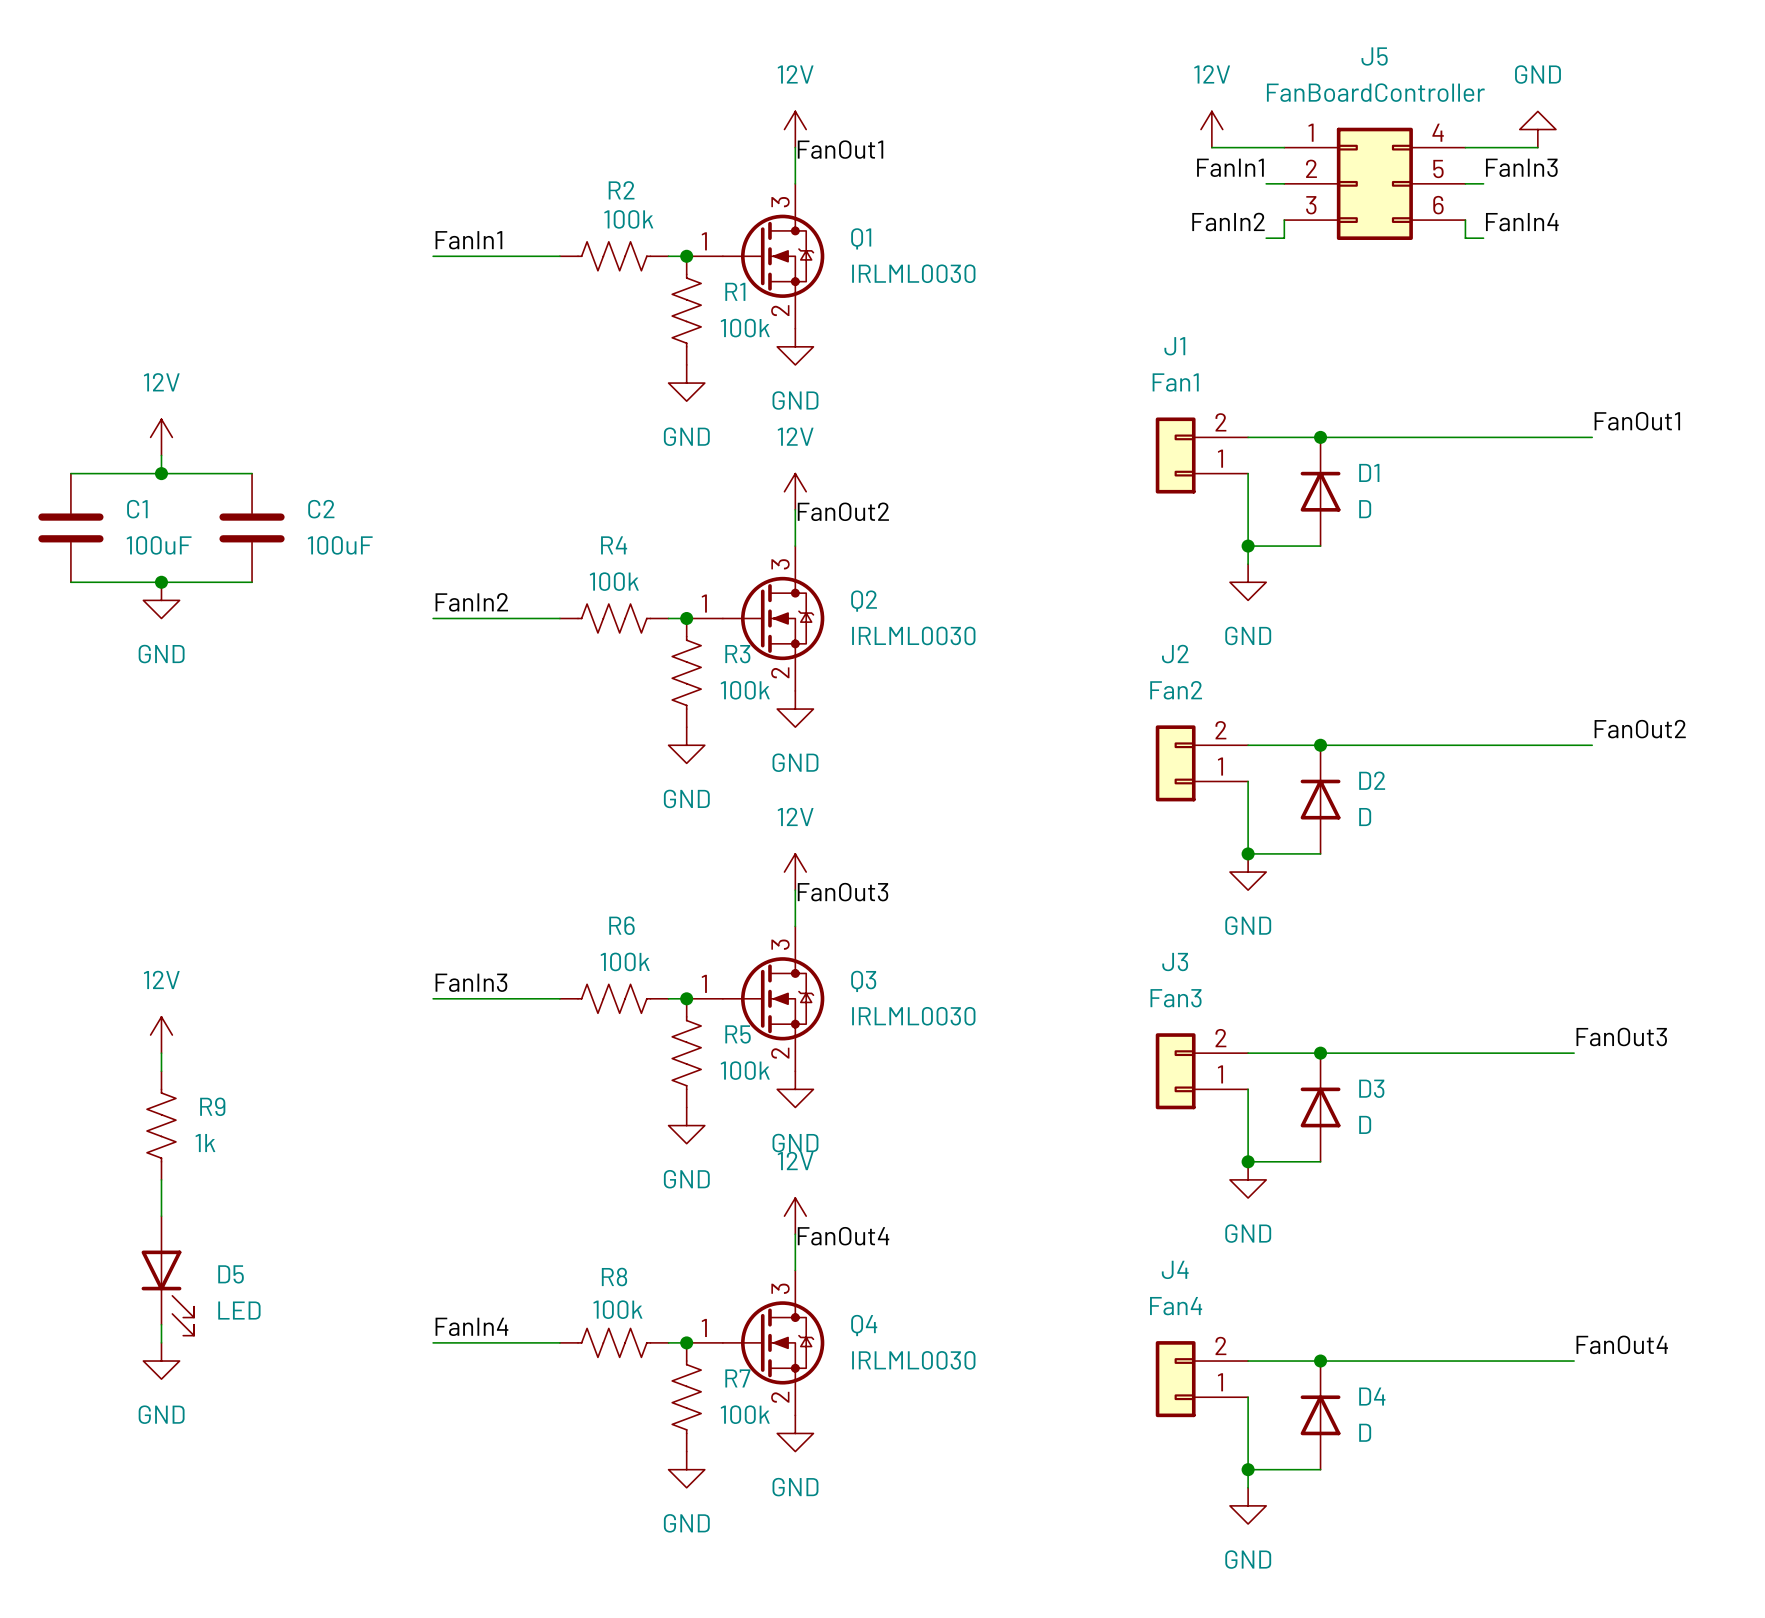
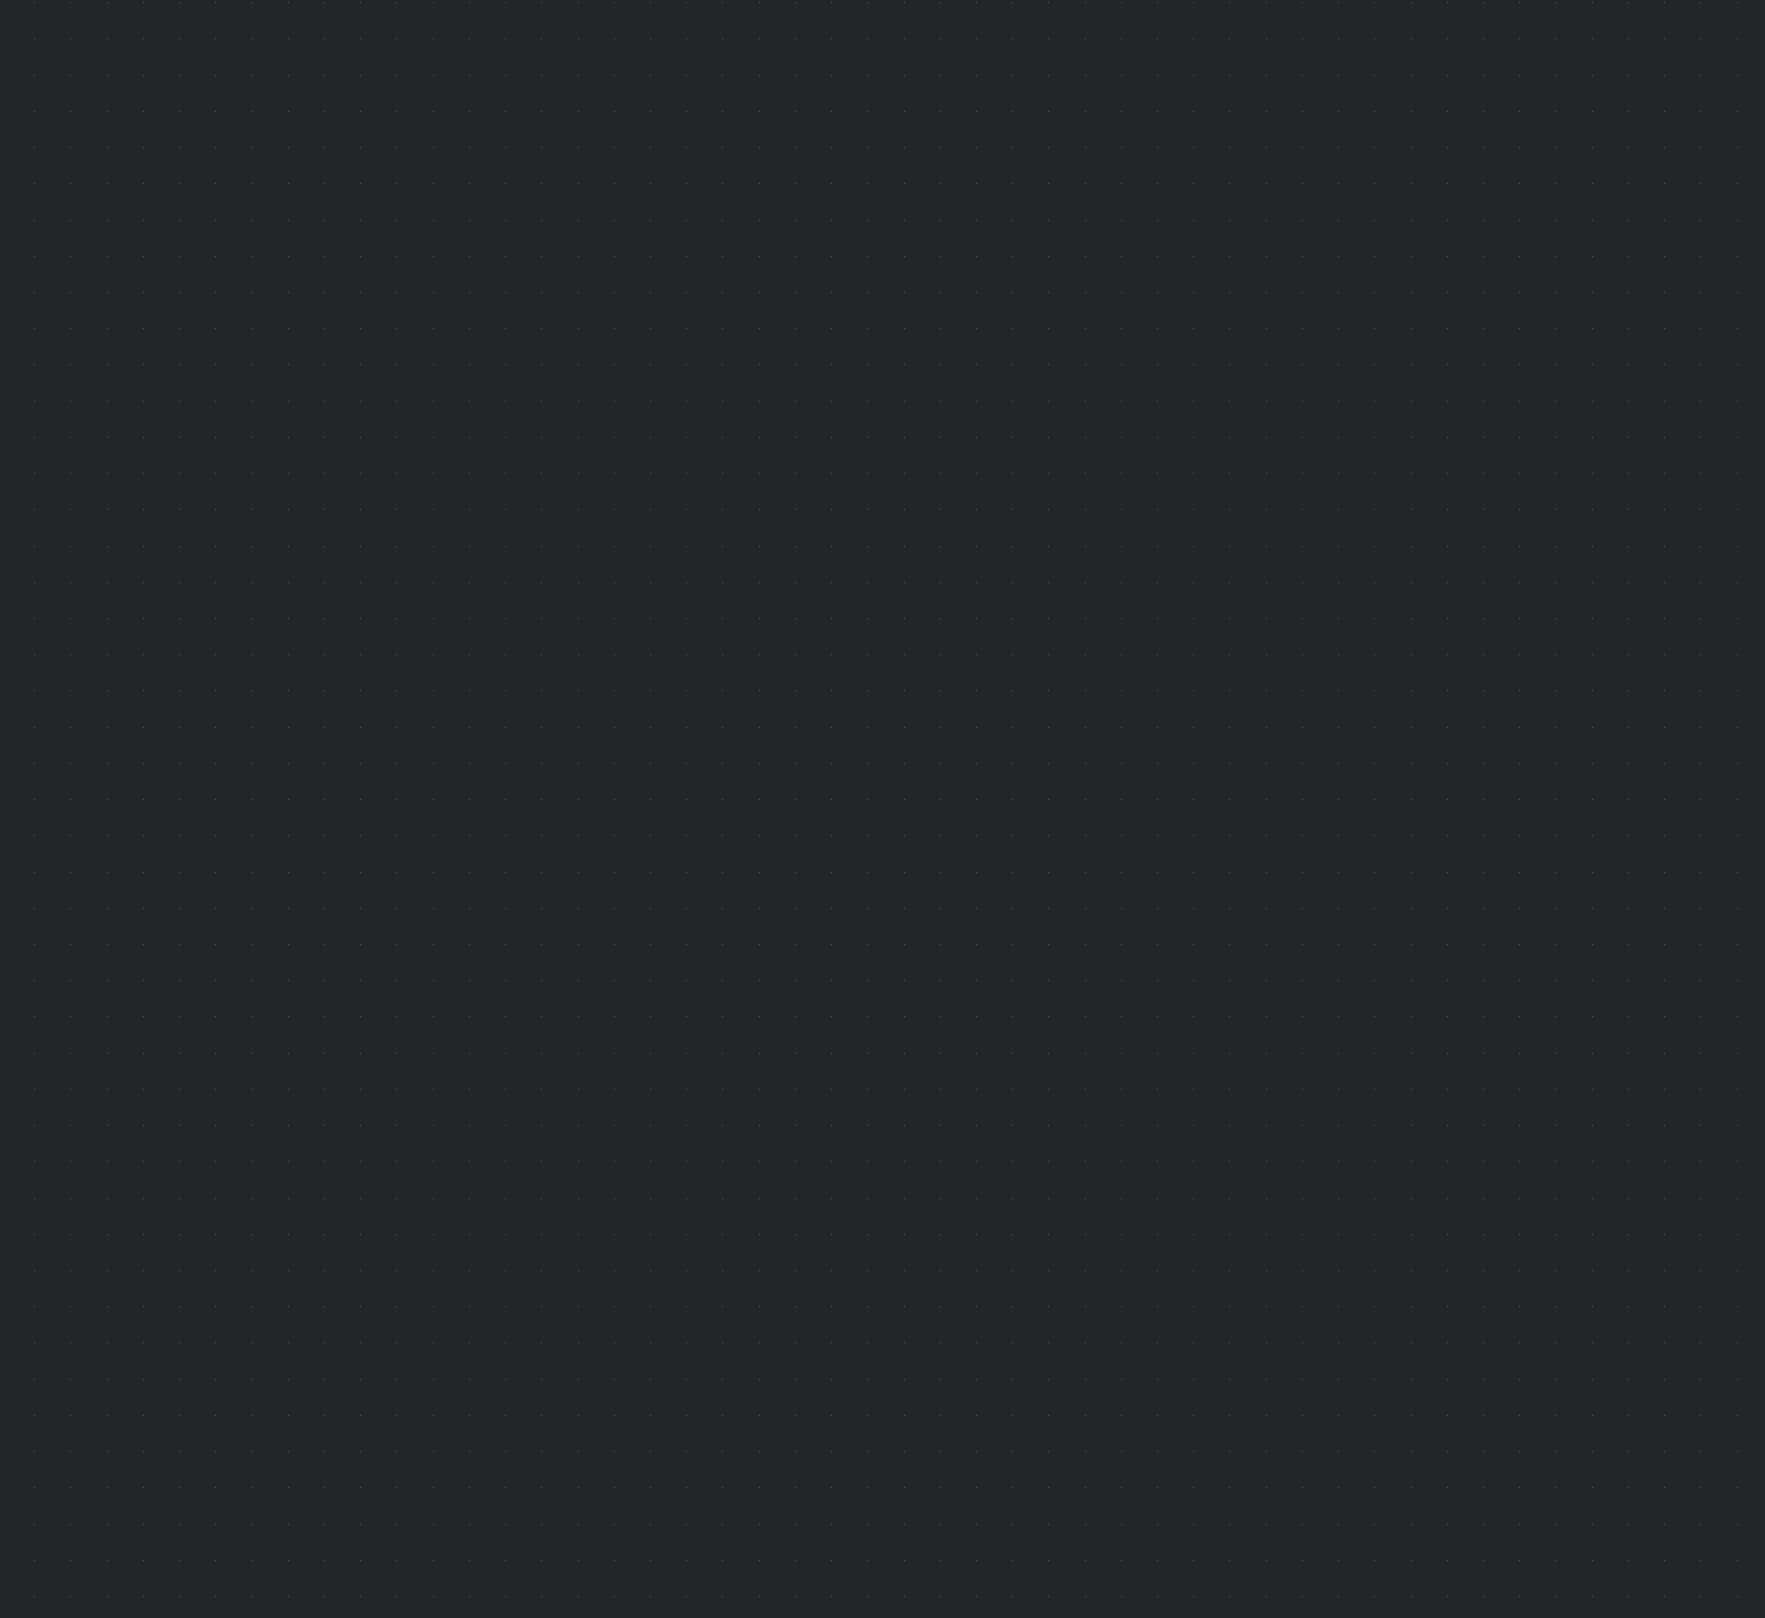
power symbol: 12V (795, 129) -> none
power symbol: 12V (1211, 129) -> none
power symbol: GND (1537, 129) -> none
wire: (795, 147) (795, 183) -> none
wire: (1211, 147) (1284, 147) -> none
wire: (1465, 147) (1537, 147) -> none
label: FanOut1 (840, 149) -> none
label: FanIn1 (1230, 167) -> none
label: FanIn3 (1521, 167) -> none
wire: (1266, 183) (1284, 183) -> none
J5: FanBoardController (1374, 183) -> none
wire: (1465, 183) (1483, 183) -> none
wire: (1284, 220) (1284, 238) (1266, 238) -> none
wire: (1465, 220) (1465, 238) (1483, 238) -> none
label: FanIn2 (1228, 222) -> none
label: FanIn4 (1522, 222) -> none
label: FanIn1 (468, 240) -> none
wire: (433, 256) (559, 256) -> none
R2: 100k (614, 256) -> none
wire: (668, 256) (686, 256) -> none
junction: (686, 256) -> none
Q1: IRLML0030 (755, 256) -> none
R1: 100k (686, 310) -> none
power symbol: GND (795, 346) -> none
power symbol: GND (686, 383) -> none
label: FanOut1 (1637, 421) -> none
power symbol: 12V (161, 437) -> none
wire: (1248, 437) (1592, 437) -> none
junction: (1320, 437) -> none
wire: (161, 455) (161, 473) -> none
J1: Fan1 (1201, 455) -> none
wire: (70, 473) (252, 473) -> none
junction: (161, 473) -> none
wire: (1248, 473) (1248, 564) -> none
power symbol: 12V (795, 491) -> none
D1: D (1320, 491) -> none
wire: (795, 509) (795, 546) -> none
label: FanOut2 (843, 511) -> none
C1: 100uF (70, 527) -> none
C2: 100uF (252, 527) -> none
wire: (1248, 546) (1320, 546) -> none
junction: (1248, 546) -> none
wire: (70, 582) (252, 582) -> none
junction: (161, 582) -> none
power symbol: GND (1248, 582) -> none
power symbol: GND (161, 600) -> none
label: FanIn2 (471, 602) -> none
wire: (433, 618) (559, 618) -> none
R4: 100k (614, 618) -> none
wire: (668, 618) (686, 618) -> none
junction: (686, 618) -> none
Q2: IRLML0030 (755, 618) -> none
R3: 100k (686, 672) -> none
power symbol: GND (795, 709) -> none
label: FanOut2 (1640, 729) -> none
power symbol: GND (686, 745) -> none
wire: (1248, 745) (1592, 745) -> none
junction: (1320, 745) -> none
J2: Fan2 (1201, 763) -> none
wire: (1248, 781) (1248, 853) (1320, 853) -> none
D2: D (1320, 799) -> none
junction: (1248, 853) -> none
power symbol: 12V (795, 872) -> none
power symbol: GND (1248, 872) -> none
wire: (795, 890) (795, 926) -> none
label: FanOut3 (843, 892) -> none
label: FanIn3 (471, 982) -> none
wire: (433, 998) (559, 998) -> none
R6: 100k (614, 998) -> none
wire: (668, 998) (686, 998) -> none
junction: (686, 998) -> none
Q3: IRLML0030 (755, 998) -> none
power symbol: 12V (161, 1035) -> none
label: FanOut3 (1621, 1036) -> none
wire: (161, 1053) (161, 1071) -> none
R5: 100k (686, 1053) -> none
wire: (1248, 1053) (1574, 1053) -> none
junction: (1320, 1053) -> none
J3: Fan3 (1201, 1071) -> none
power symbol: GND (795, 1089) -> none
wire: (1248, 1089) (1248, 1161) (1320, 1161) -> none
D3: D (1320, 1107) -> none
R9: 1k (161, 1125) -> none
power symbol: GND (686, 1125) -> none
junction: (1248, 1161) -> none
wire: (161, 1179) (161, 1216) -> none
power symbol: GND (1248, 1179) -> none
power symbol: 12V (795, 1216) -> none
wire: (795, 1234) (795, 1270) -> none
label: FanOut4 (843, 1236) -> none
D5: LED (167, 1275) -> none
wire: (161, 1324) (161, 1342) -> none
label: FanIn4 (471, 1326) -> none
wire: (433, 1342) (559, 1342) -> none
R8: 100k (614, 1342) -> none
wire: (668, 1342) (686, 1342) -> none
junction: (686, 1342) -> none
Q4: IRLML0030 (755, 1342) -> none
label: FanOut4 (1622, 1344) -> none
power symbol: GND (161, 1361) -> none
wire: (1248, 1361) (1574, 1361) -> none
junction: (1320, 1361) -> none
J4: Fan4 (1201, 1379) -> none
R7: 100k (686, 1397) -> none
wire: (1248, 1397) (1248, 1487) -> none
D4: D (1320, 1415) -> none
power symbol: GND (795, 1433) -> none
power symbol: GND (686, 1469) -> none
wire: (1248, 1469) (1320, 1469) -> none
junction: (1248, 1469) -> none
power symbol: GND (1248, 1505) -> none

